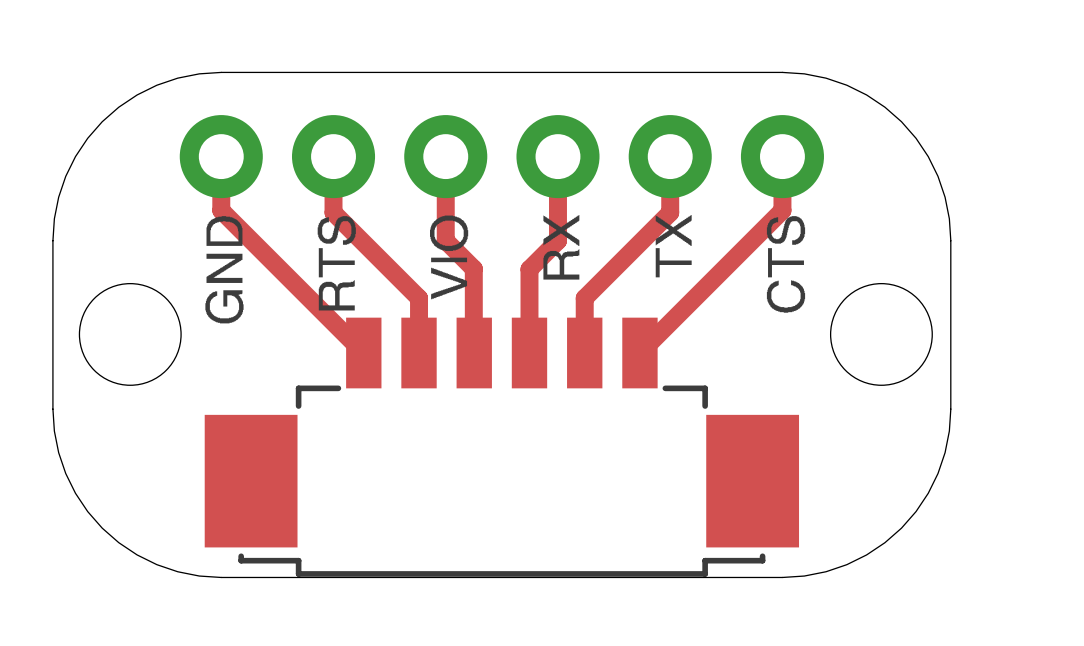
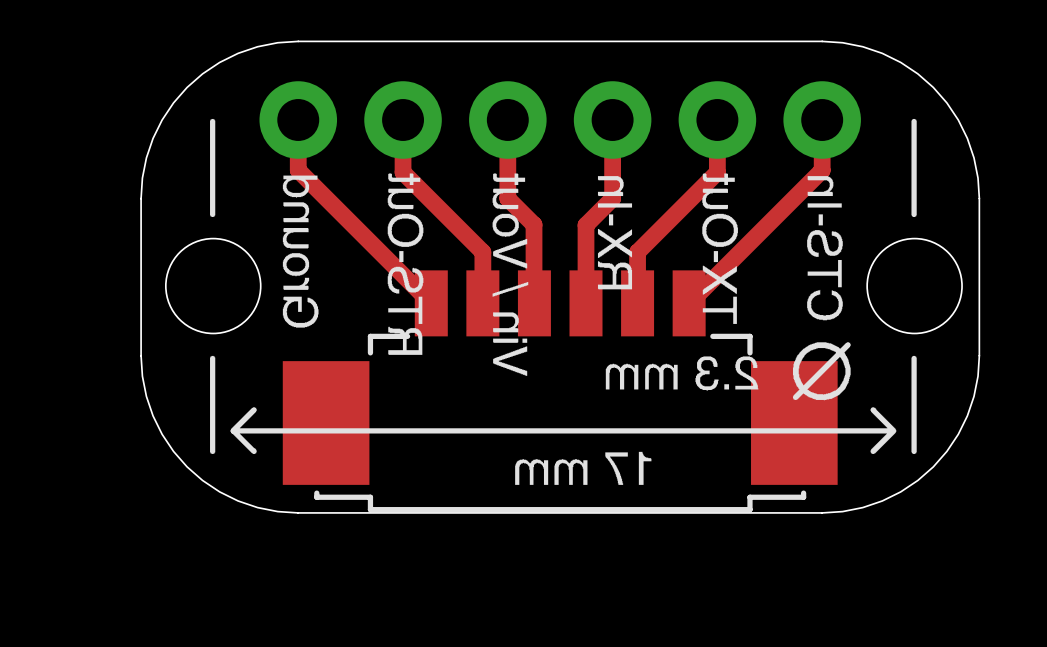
drawing: none -> [210, 118, 917, 485]
drawing: [205, 215, 806, 324] -> none

